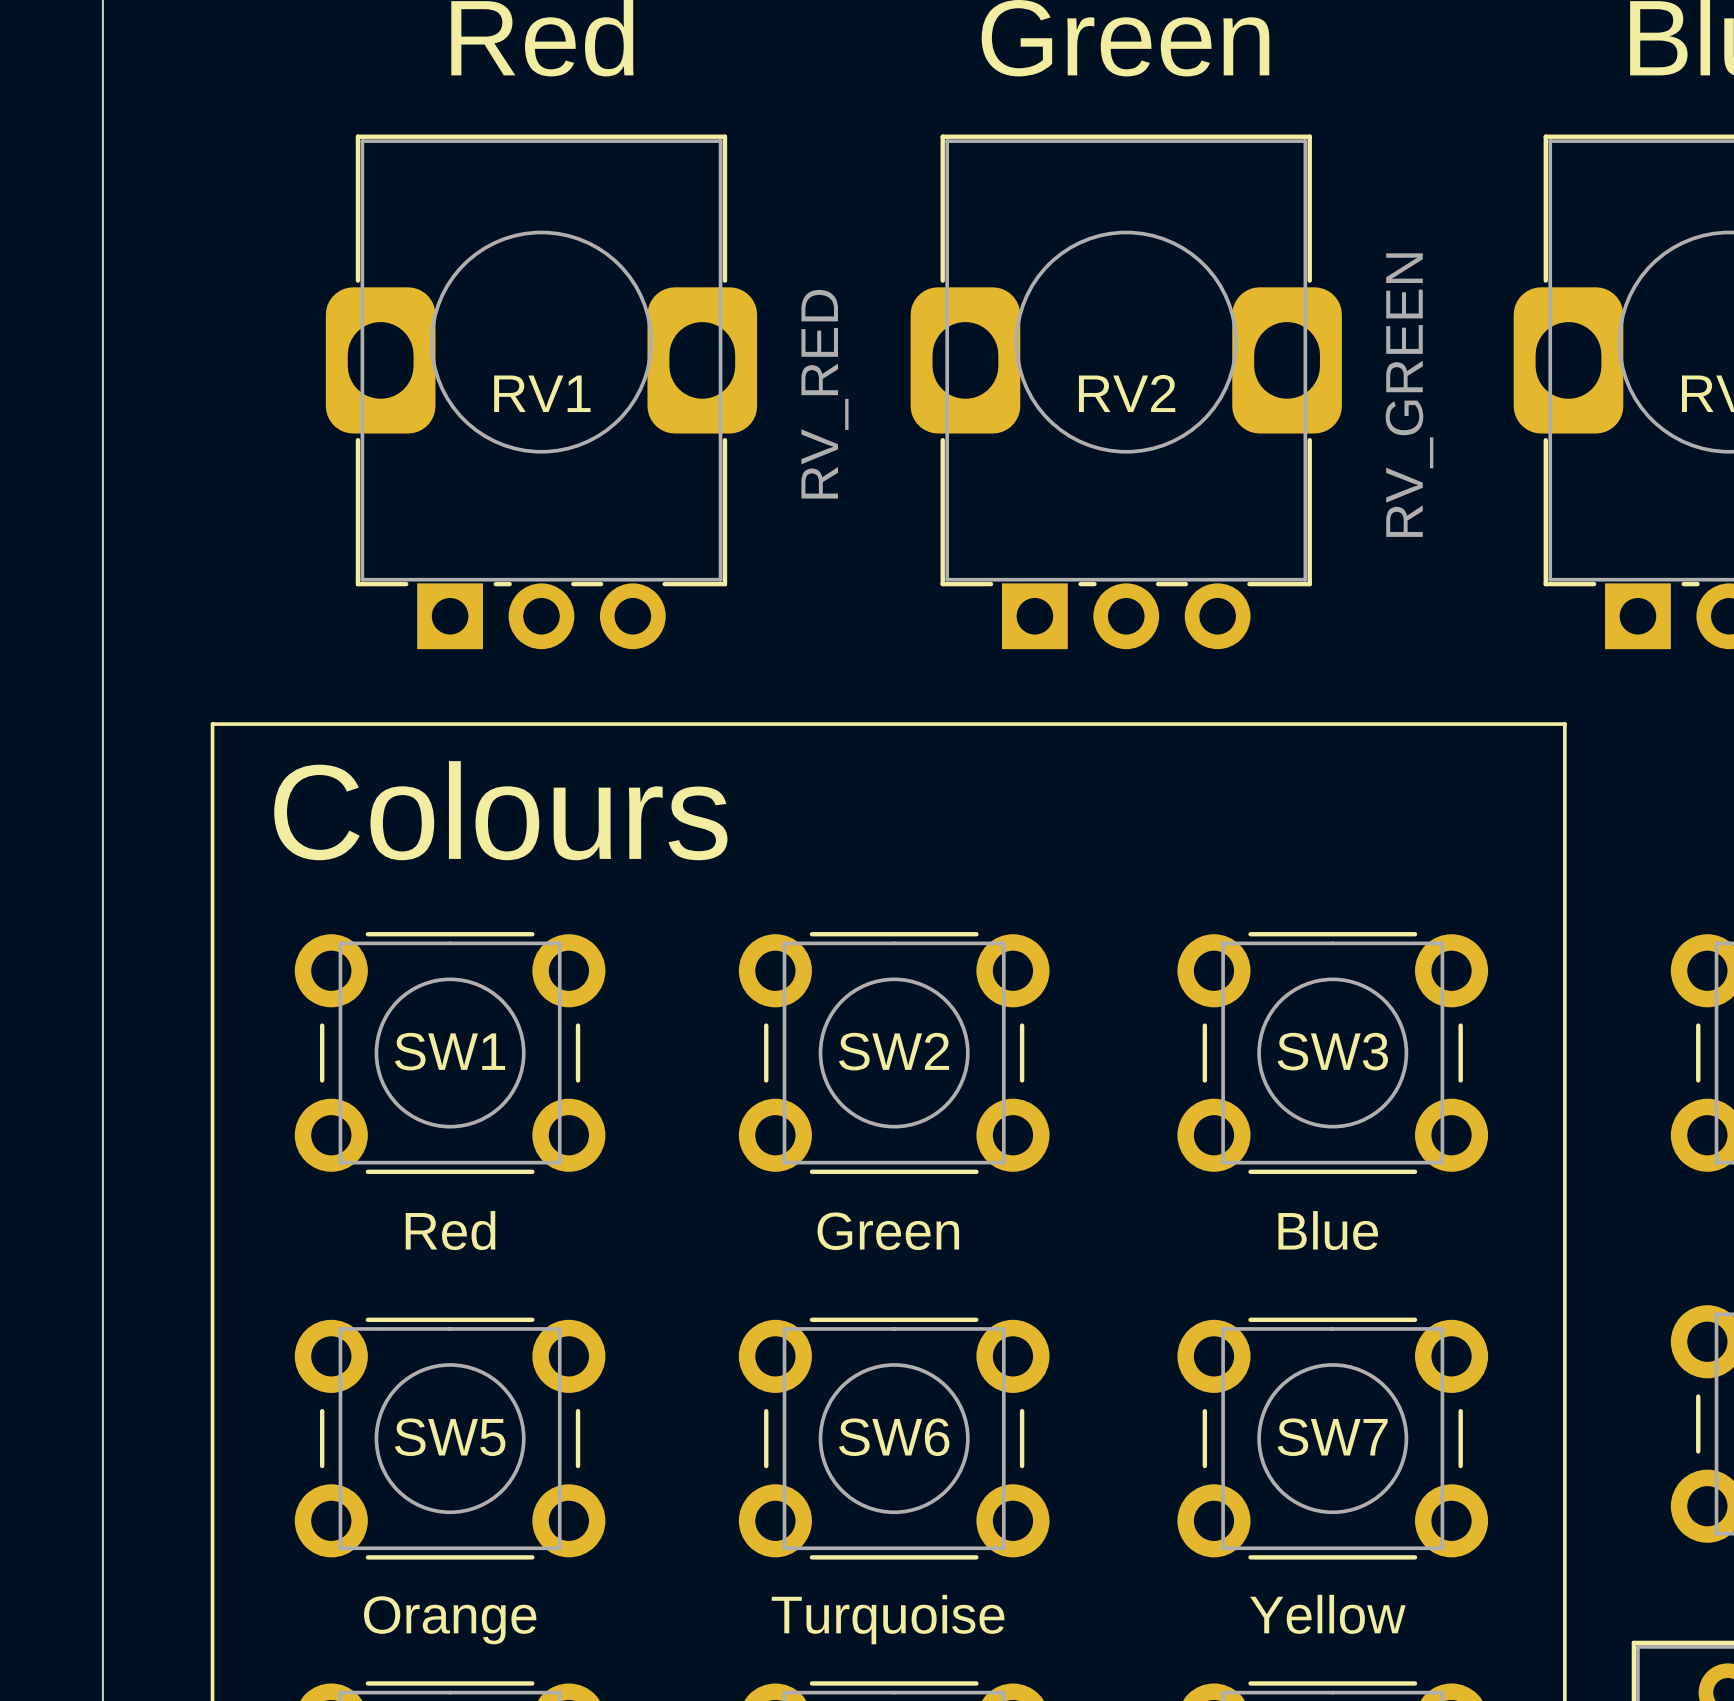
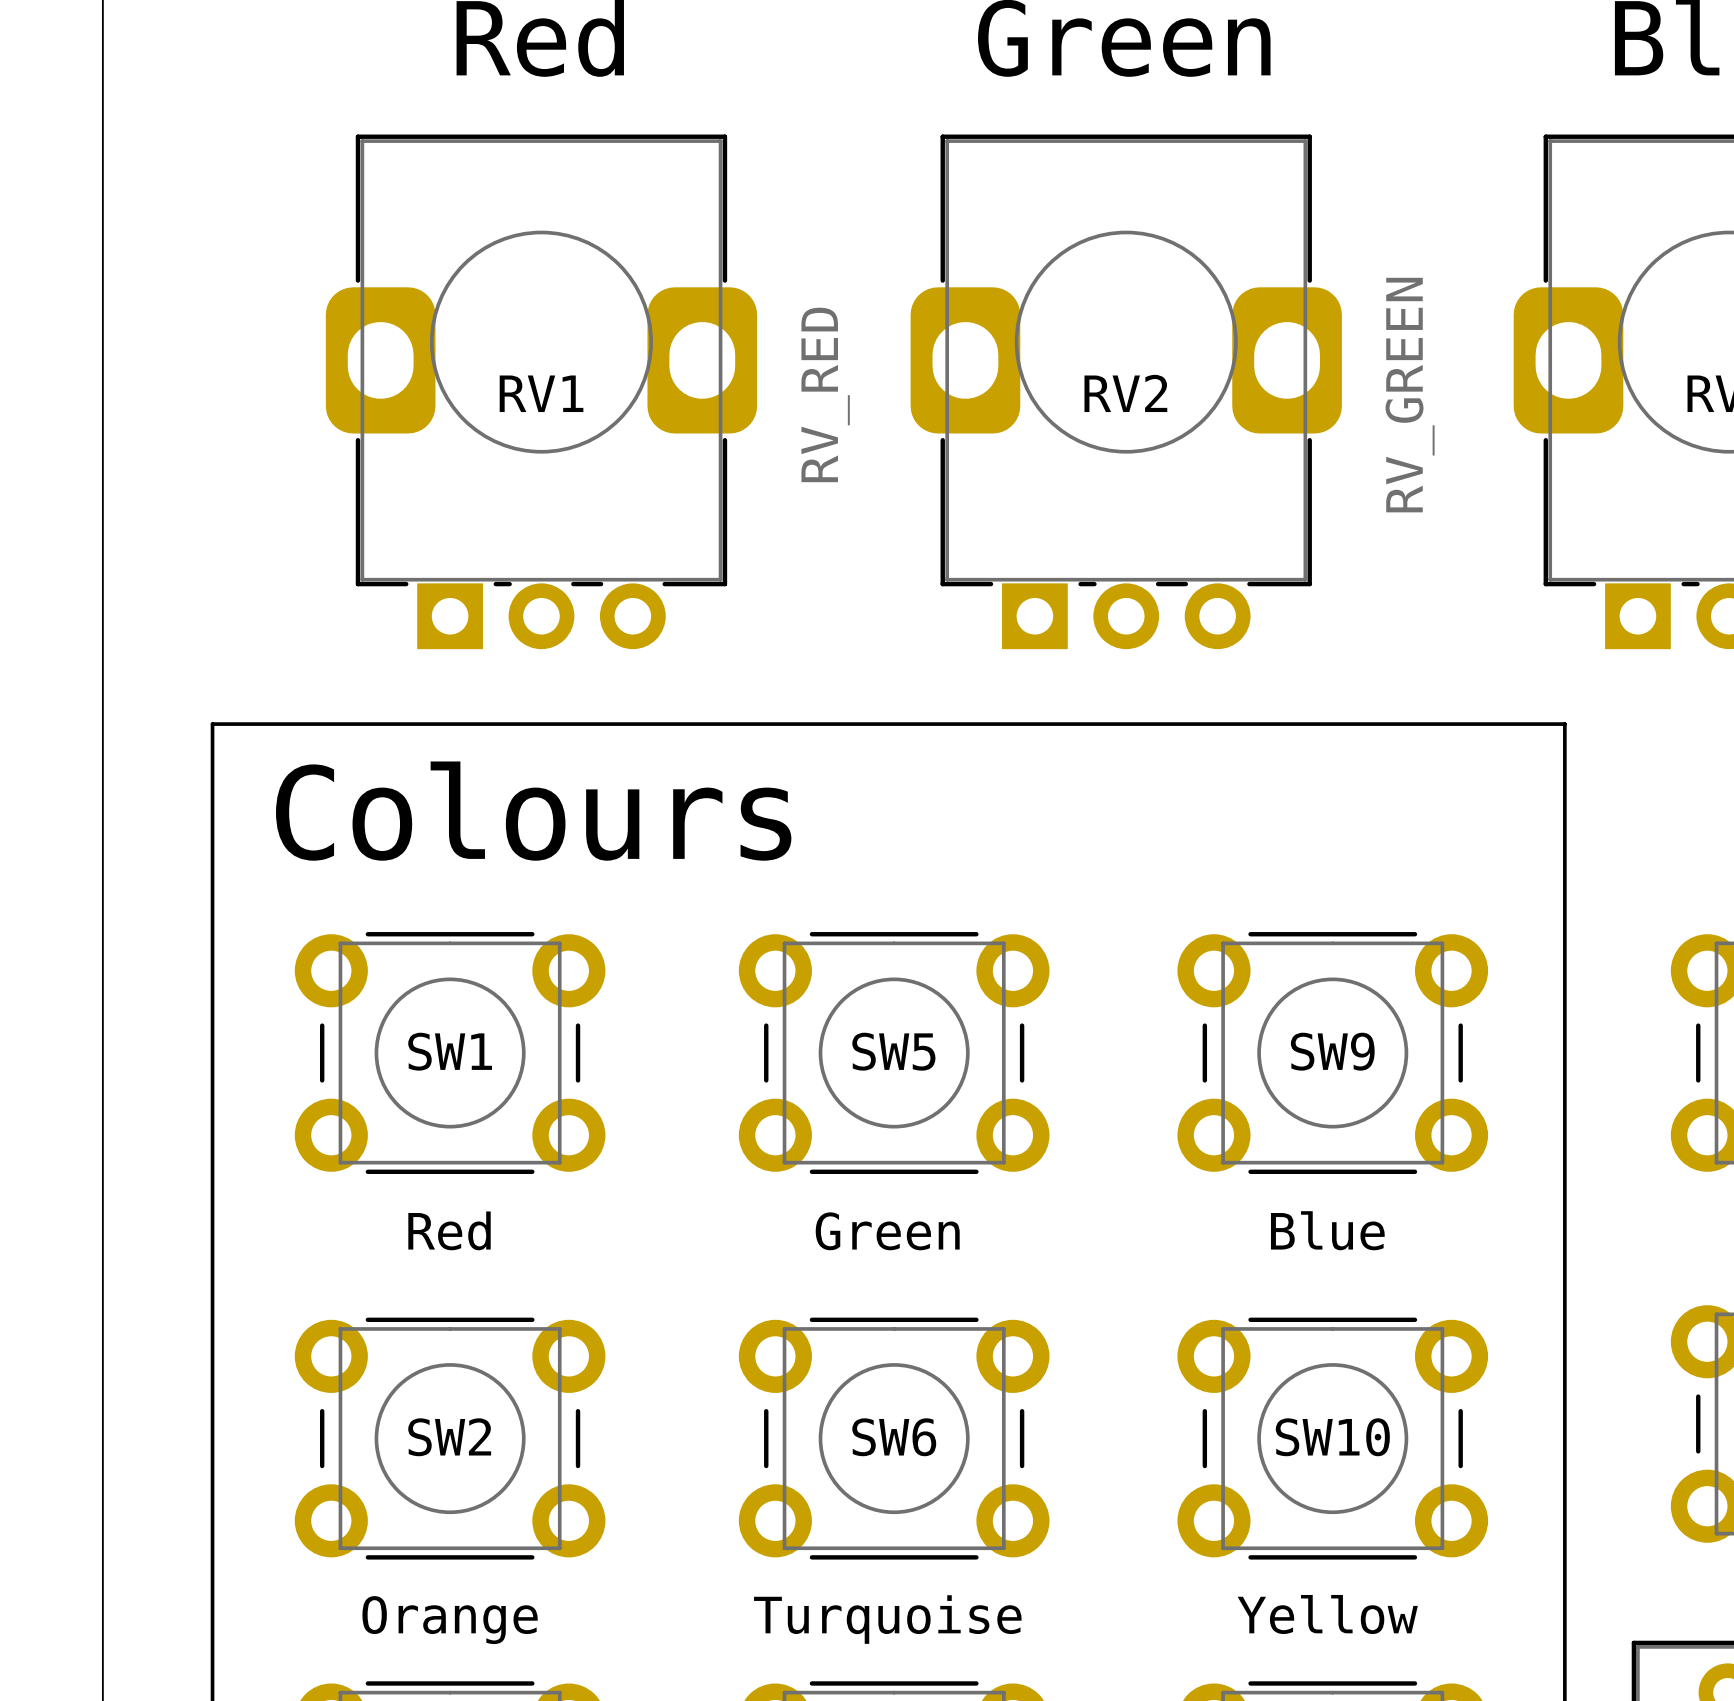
SW2 name: SW2 (894, 1051) -> SW5 (893, 1051)
SW3 name: SW3 (1332, 1051) -> SW9 (1332, 1051)
SW5 name: SW5 (450, 1437) -> SW2 (449, 1437)
SW7 name: SW7 (1332, 1437) -> SW10 (1332, 1437)

